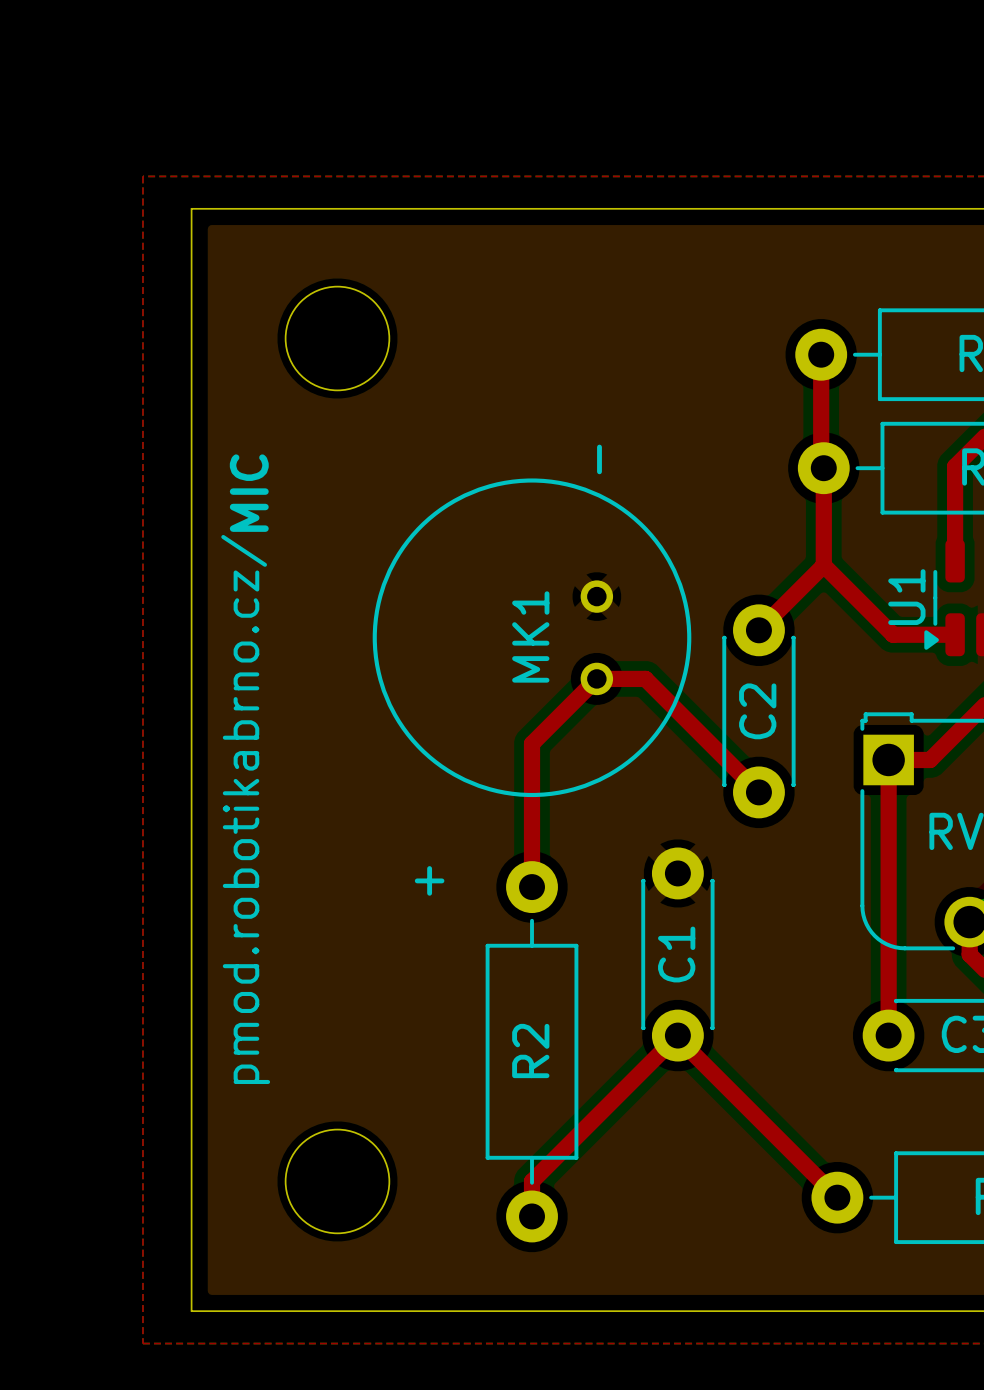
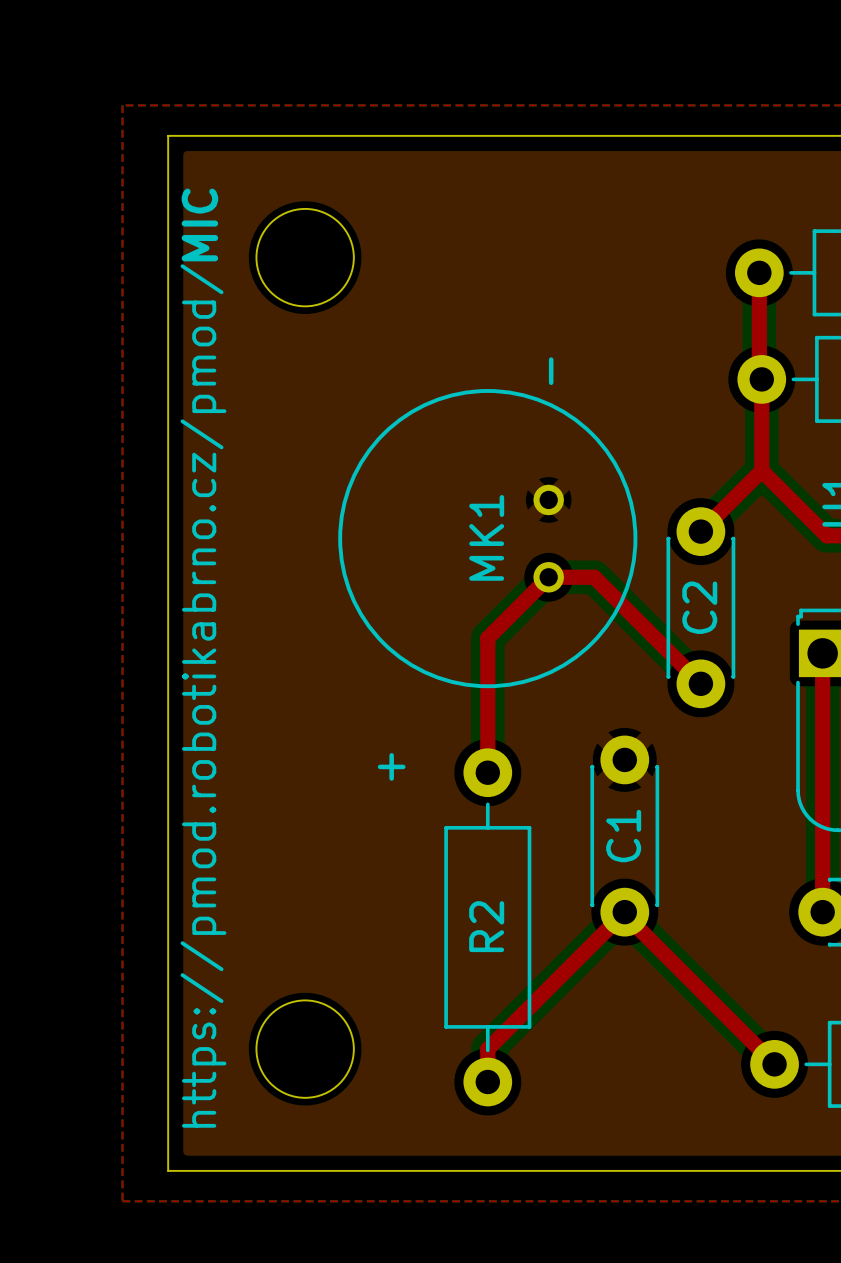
text position: MIC (249, 493) -> MIC (199, 224)
text: pmod.robotikabrno.cz/ (245, 809) -> https://pmod.robotikabrno.cz/pmod/ (203, 696)

